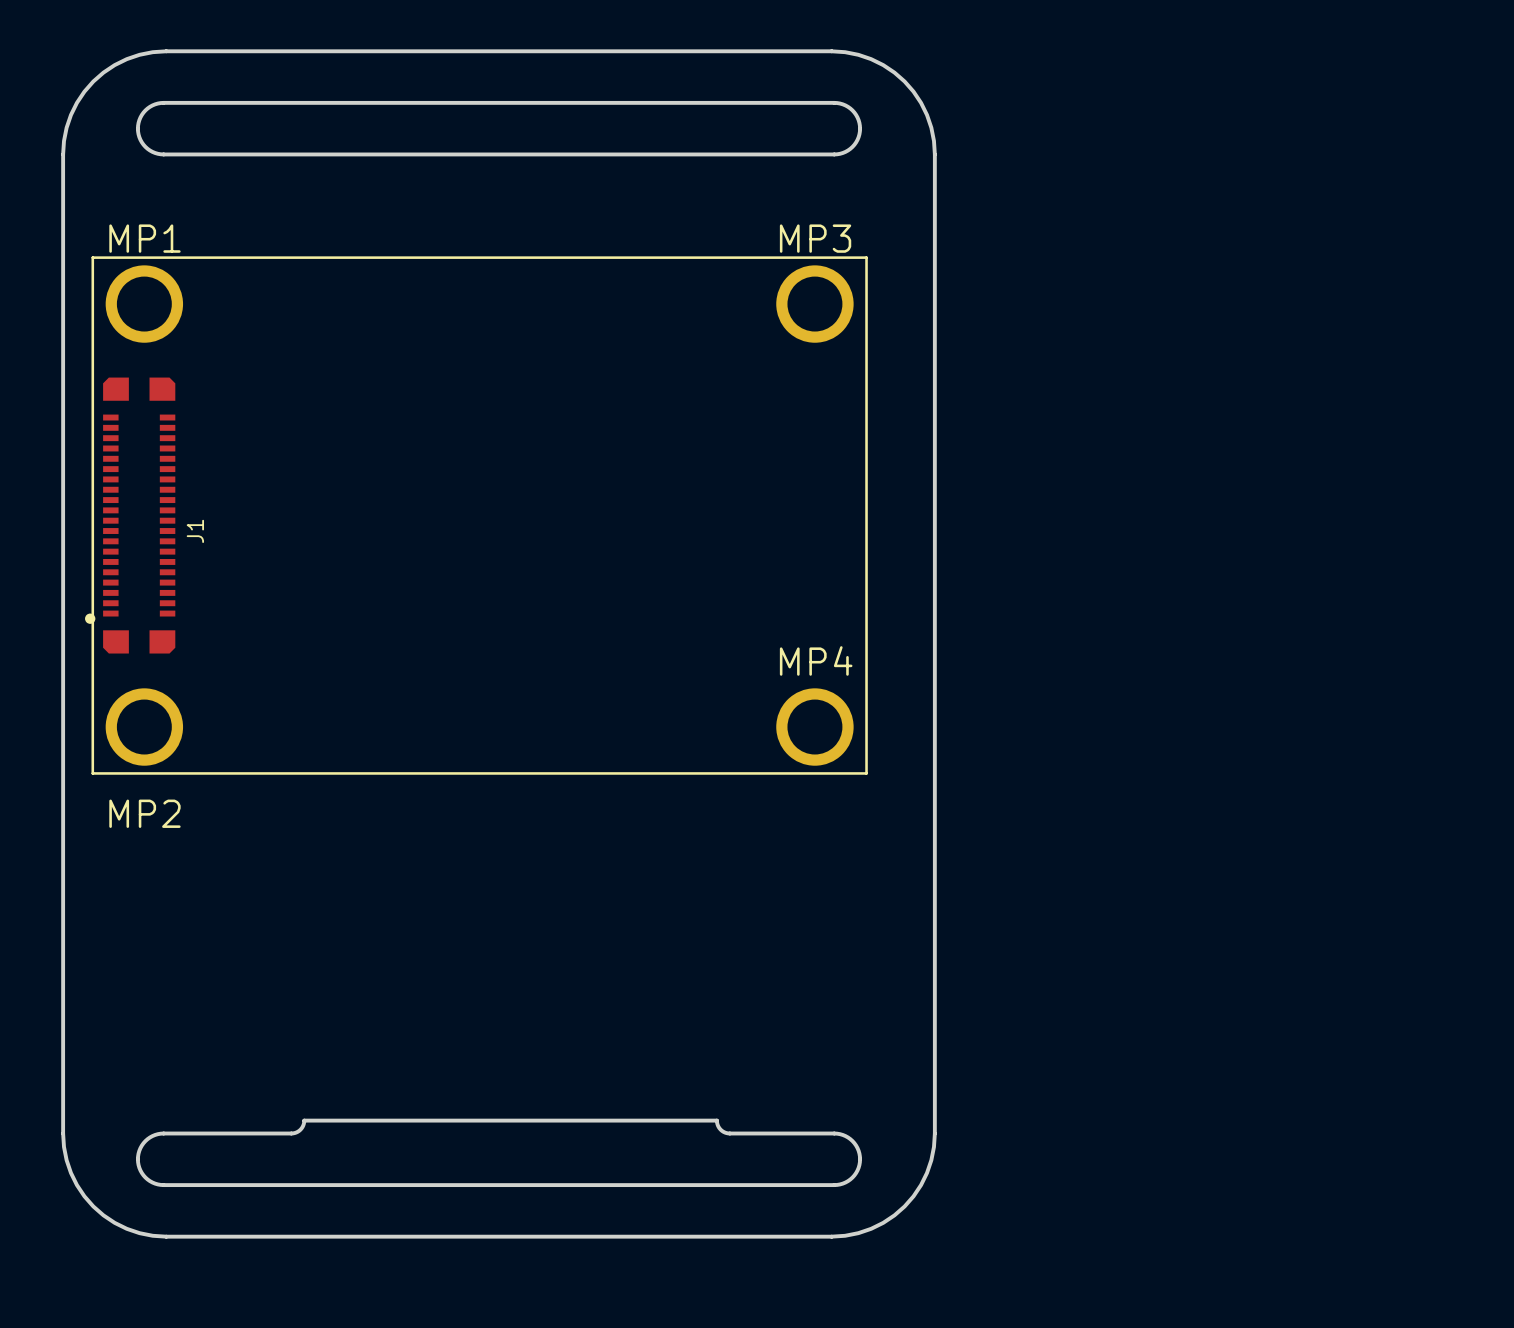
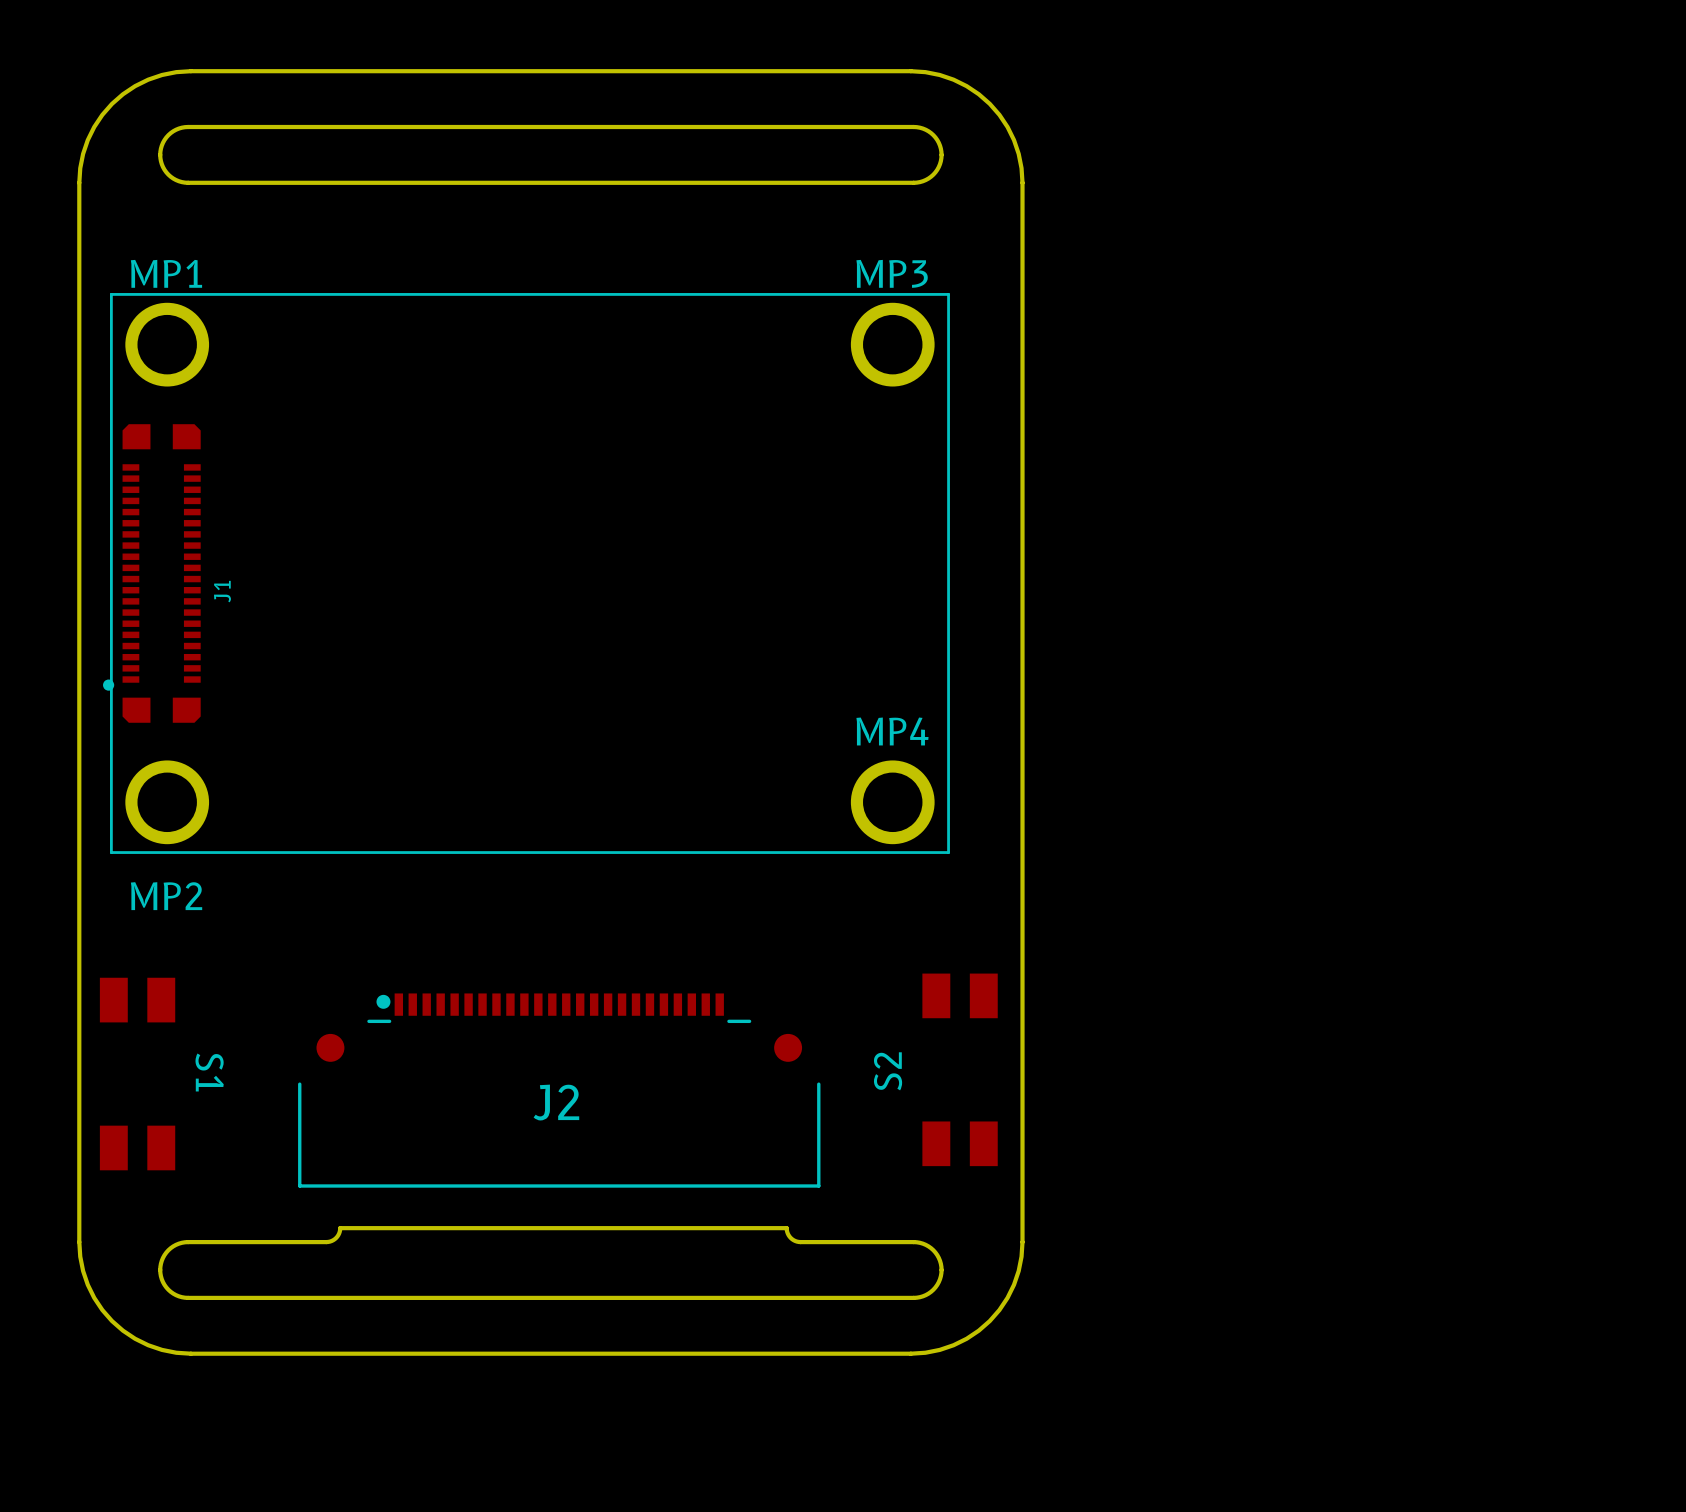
S2: none -> (960, 1069)
S1: none -> (137, 1074)
J2: none -> (559, 1090)

